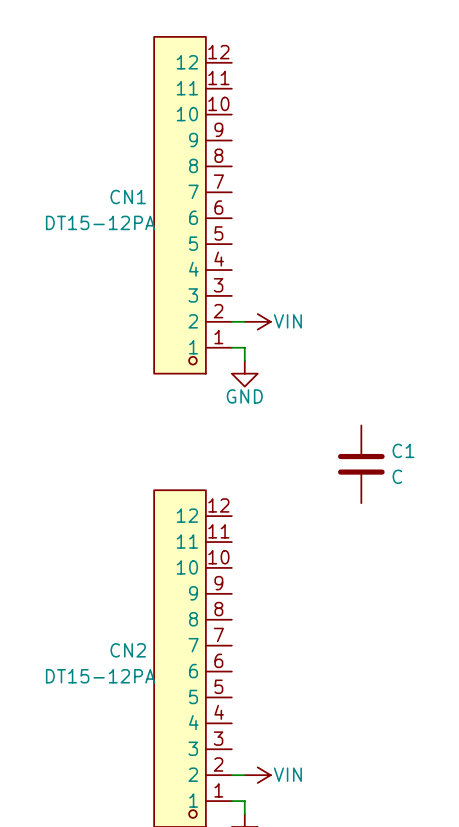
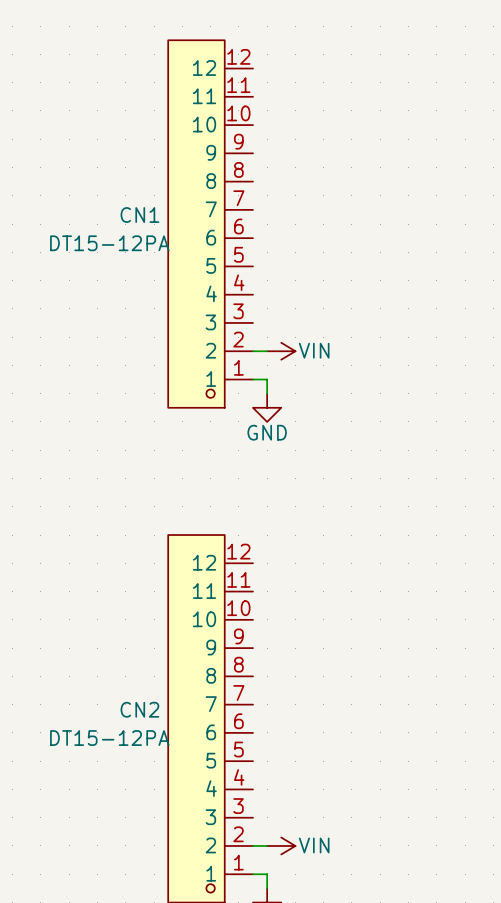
C1: C (361, 464) -> none

